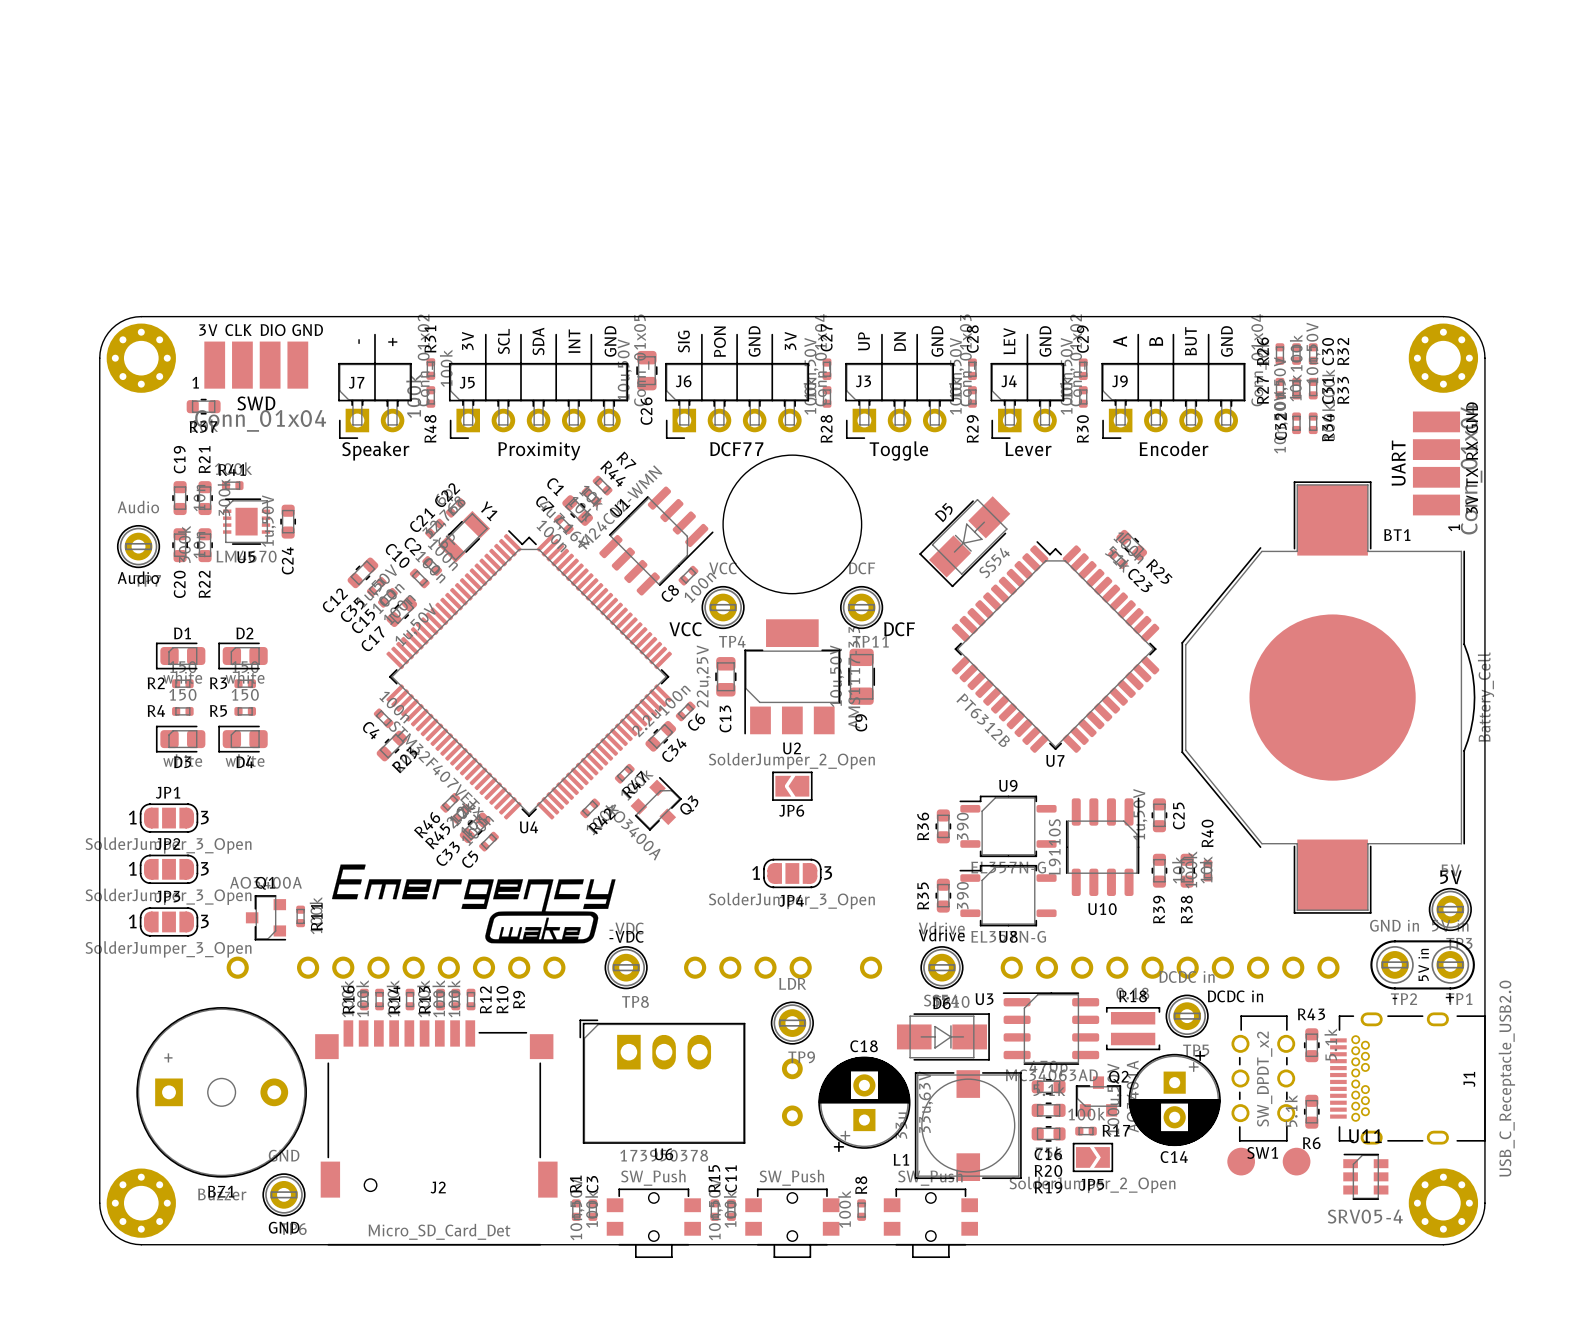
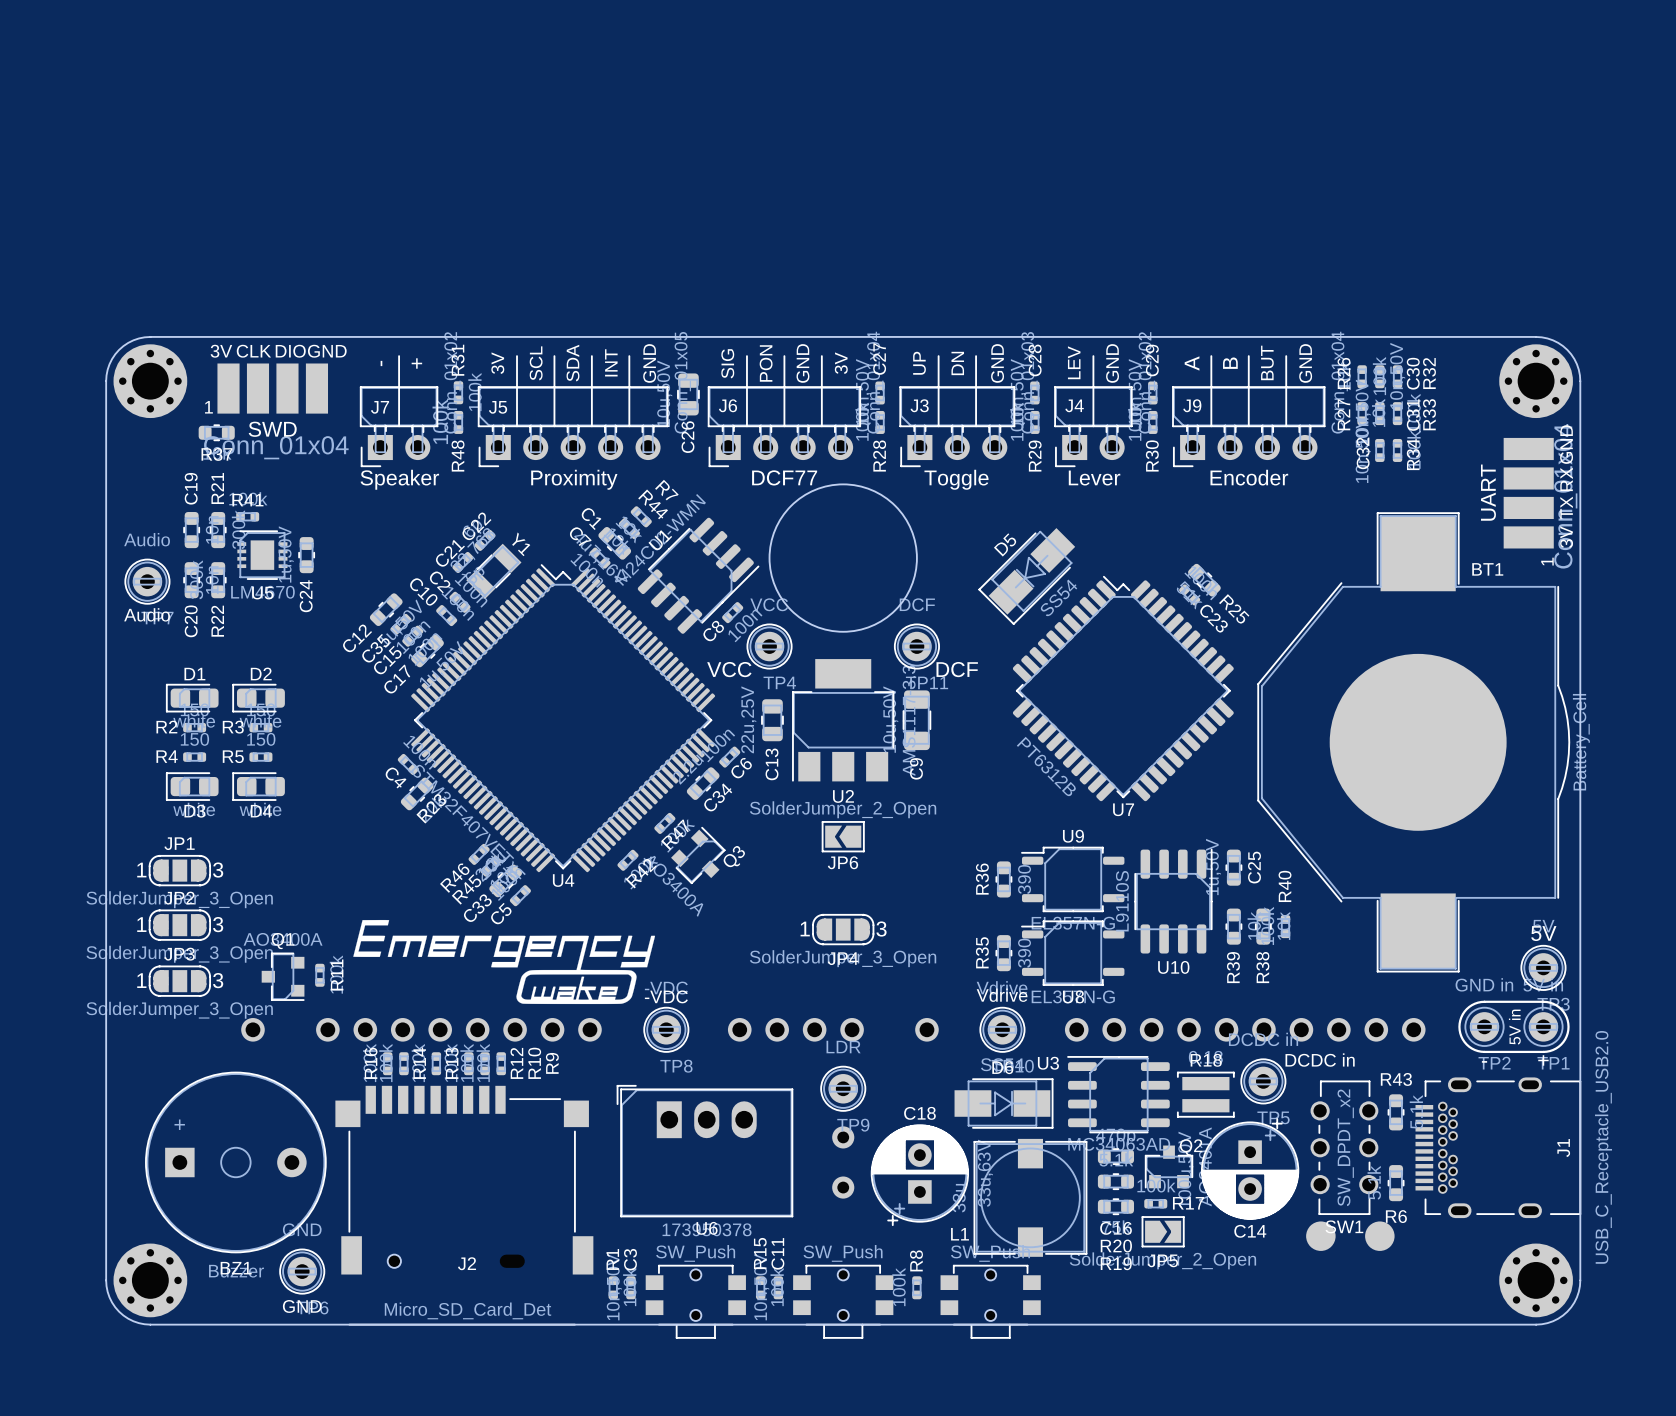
U11: SRV05-4 (1365, 1176) -> none

